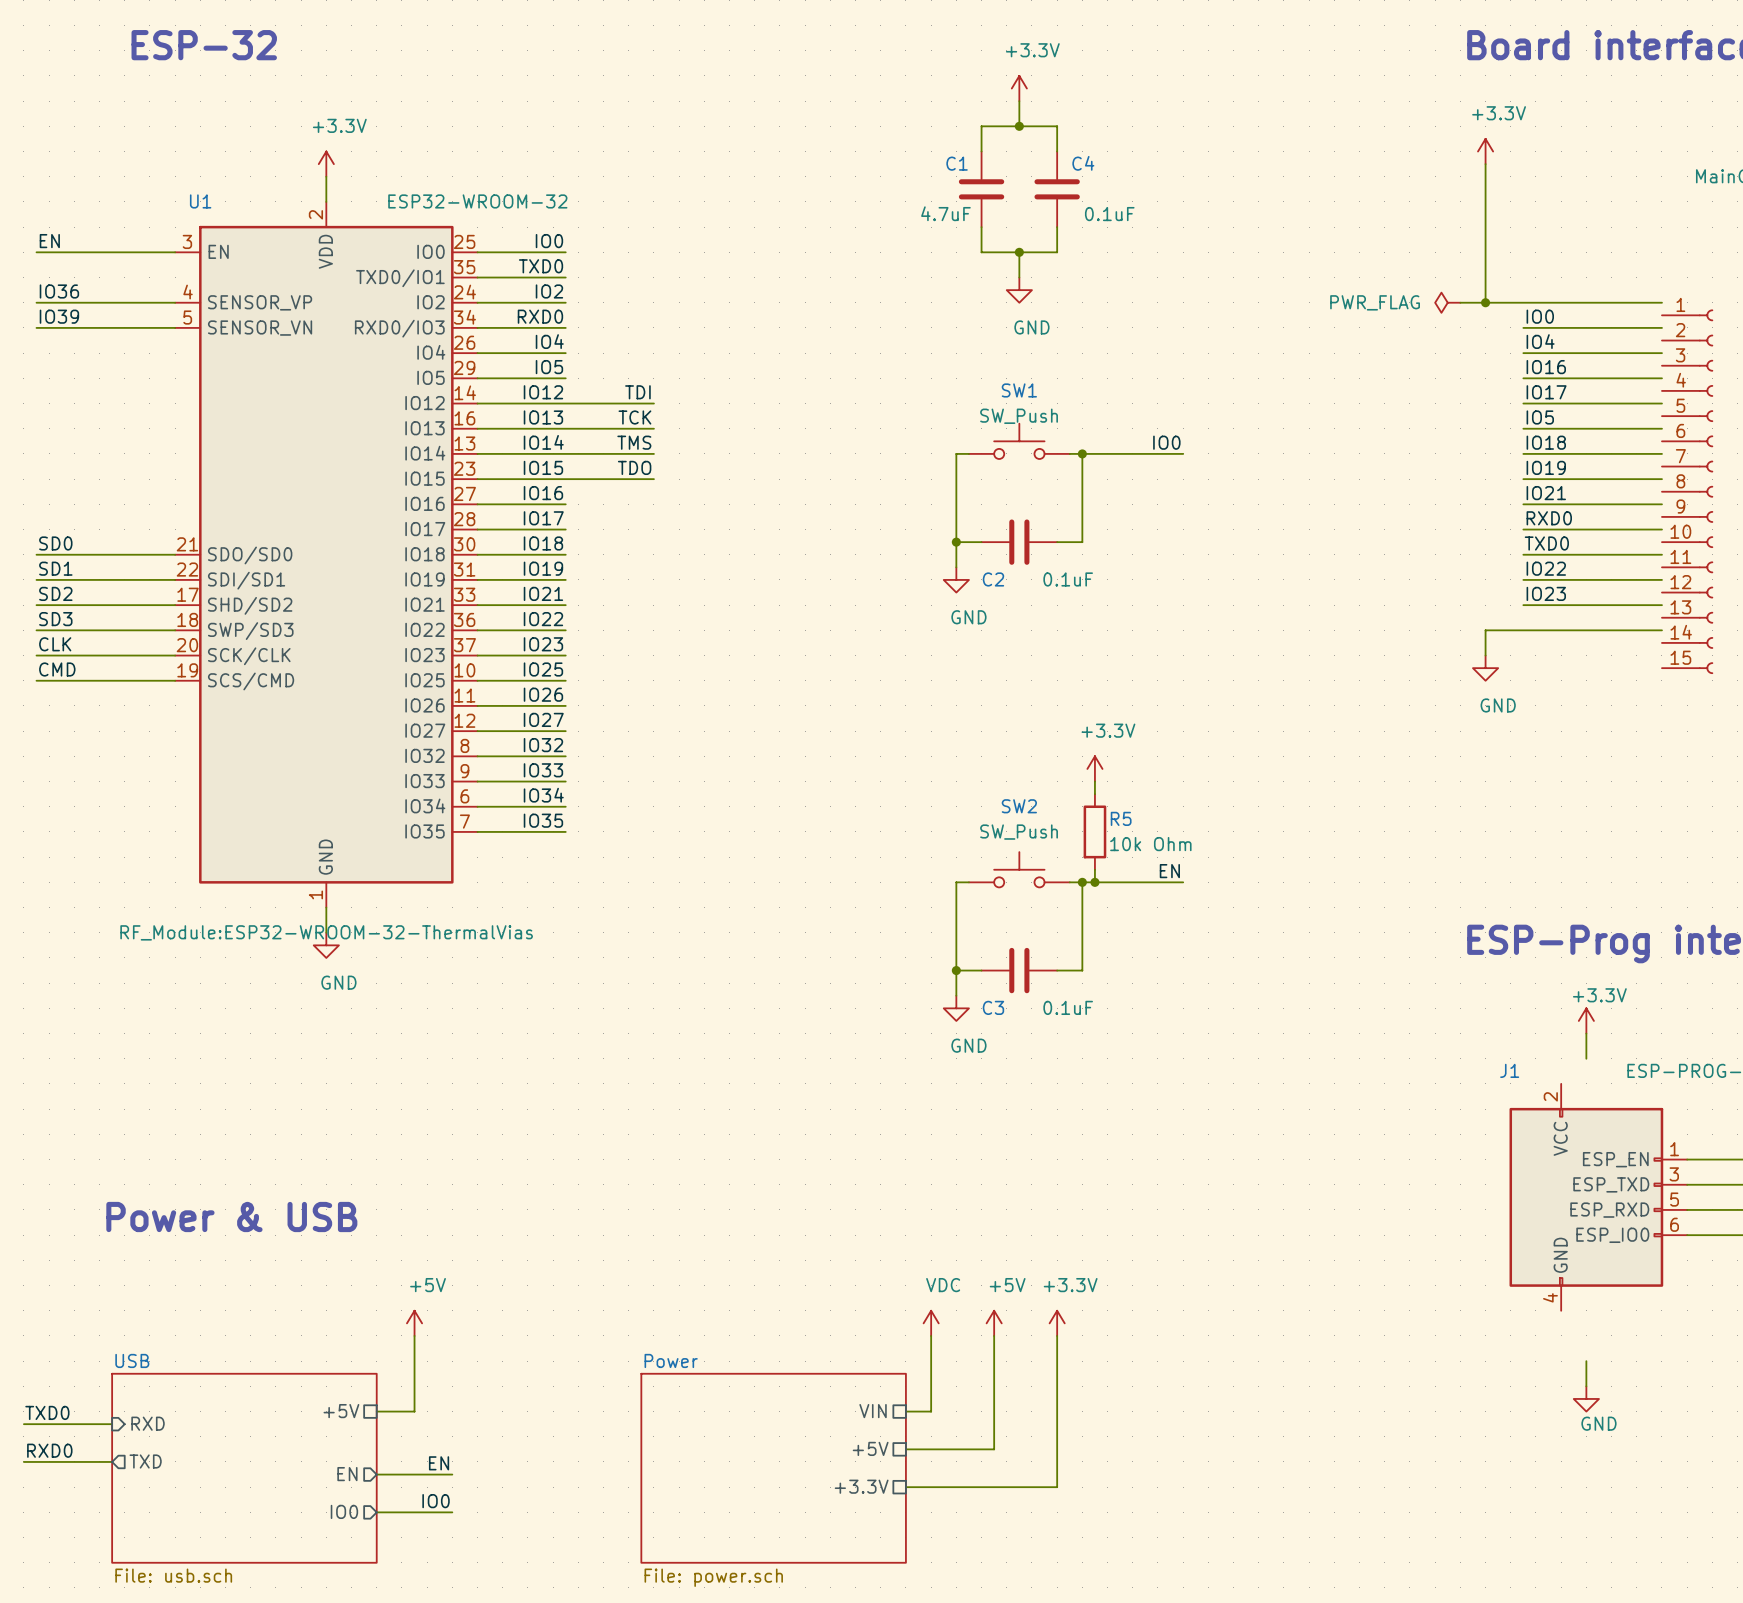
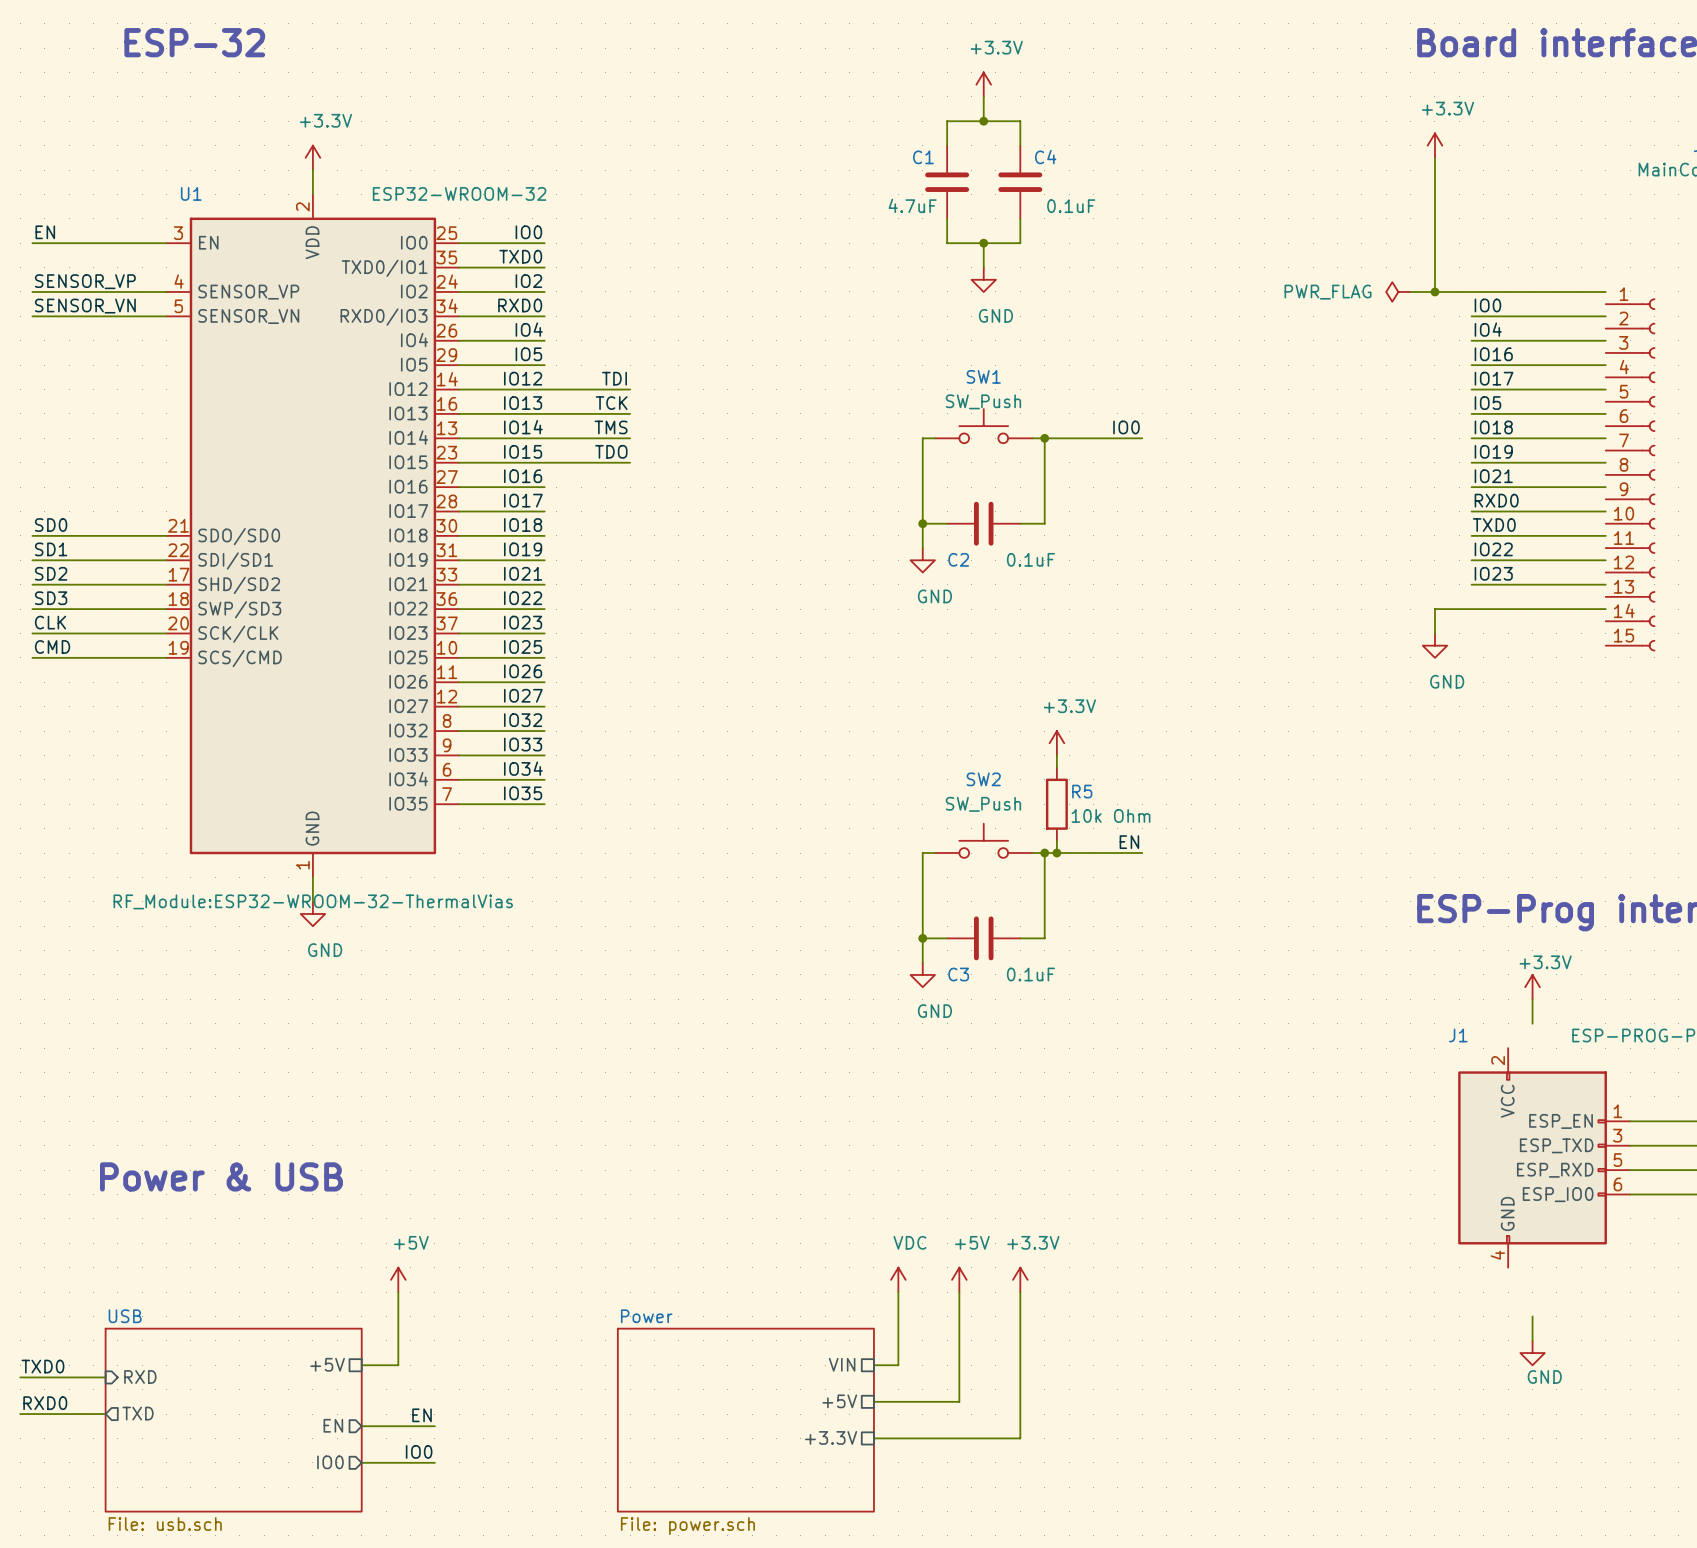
label: IO36 (59, 291) -> SENSOR_VP (85, 281)
label: IO39 (59, 316) -> SENSOR_VN (85, 306)

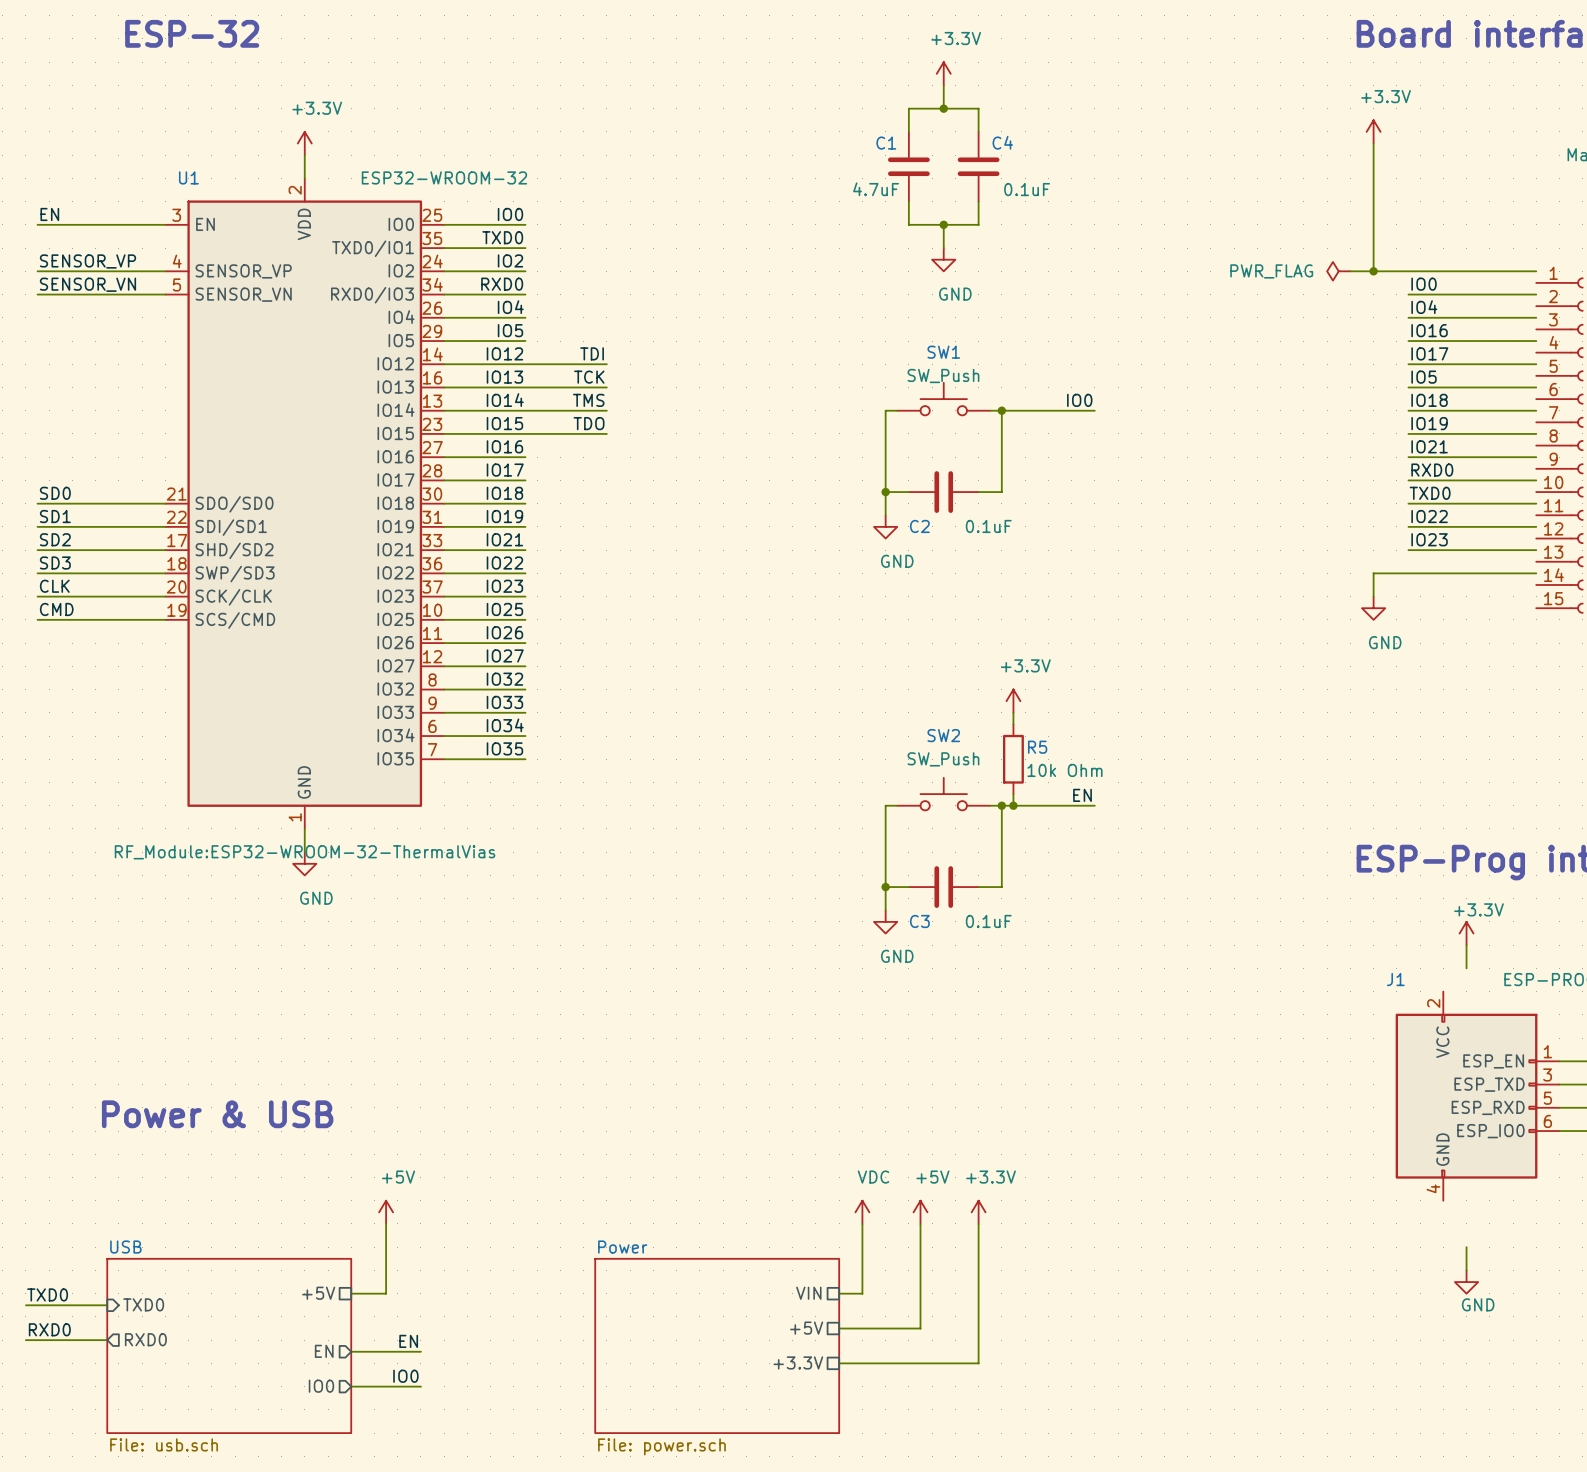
sheet pin: RXD (140, 1376) -> TXD0 (143, 1304)
sheet pin: TXD (138, 1413) -> RXD0 (145, 1339)

